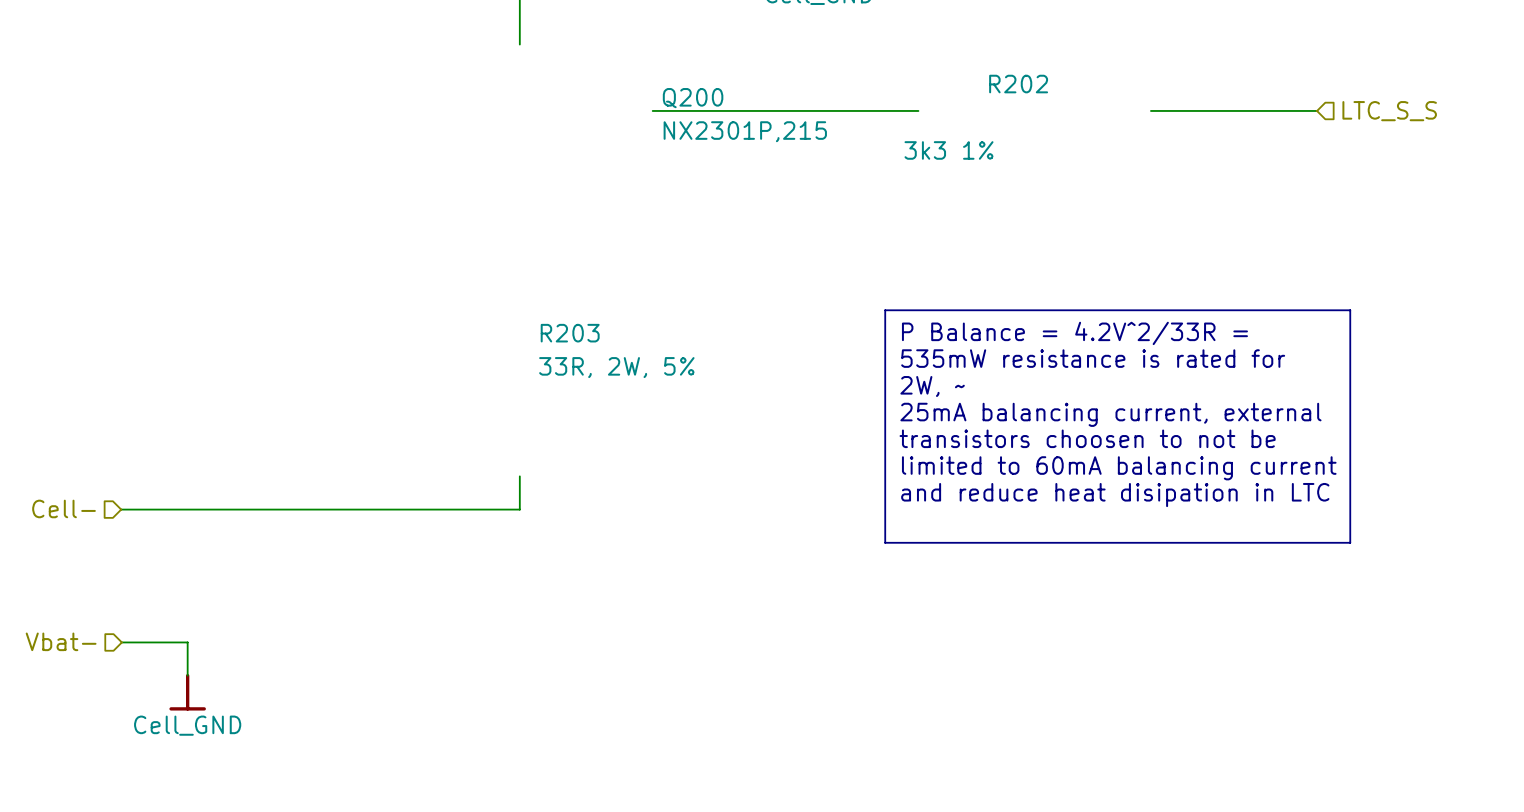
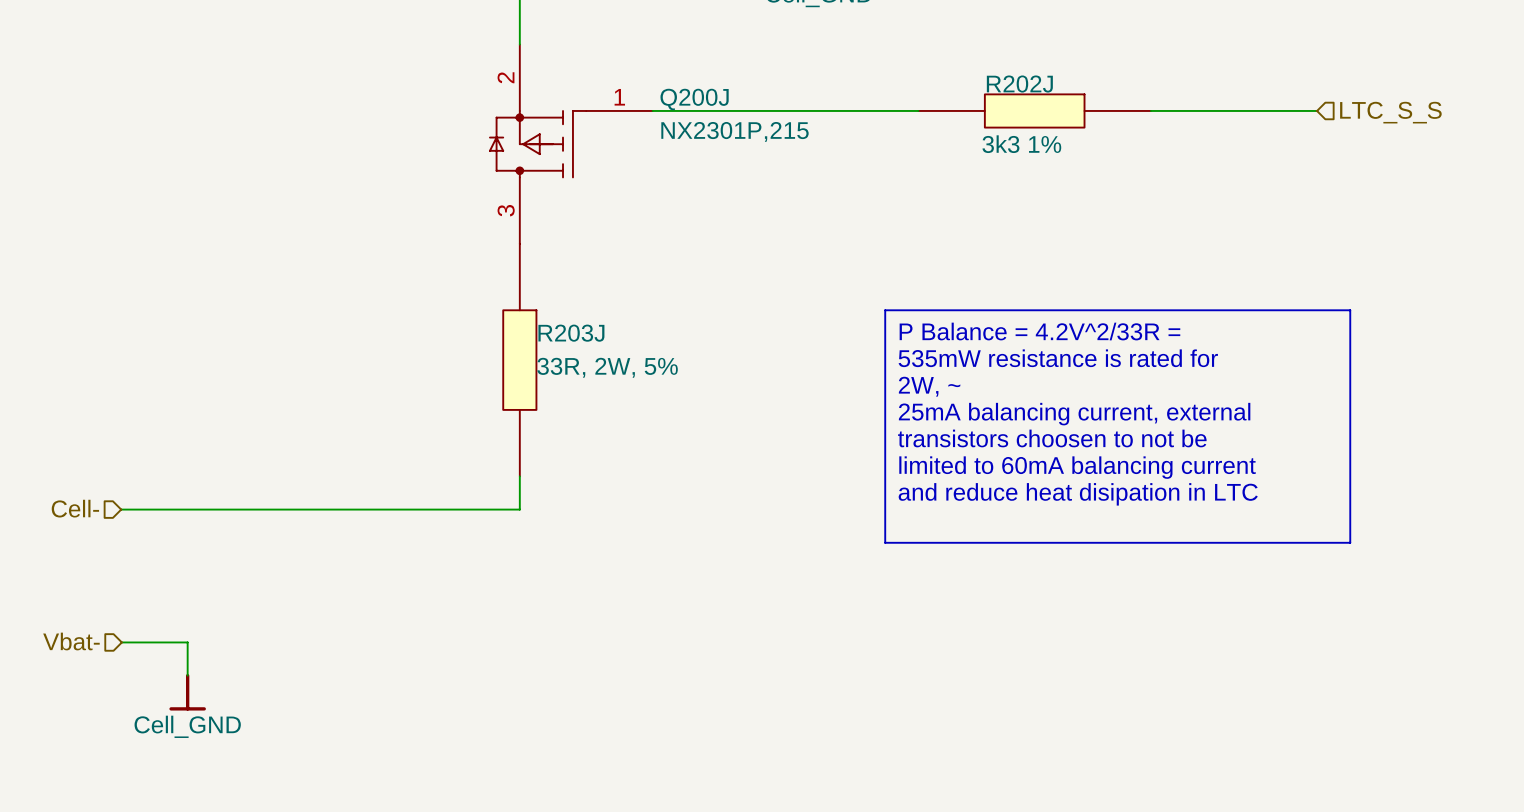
R202J: none -> 3k3 1% (1034, 110)
R202: 3k3 1% (976, 117) -> none
Q200J: none -> NX2301P,215 (571, 144)
R203: 33R, 2W, 5% (616, 350) -> none
R203J: none -> 33R, 2W, 5% (519, 360)

